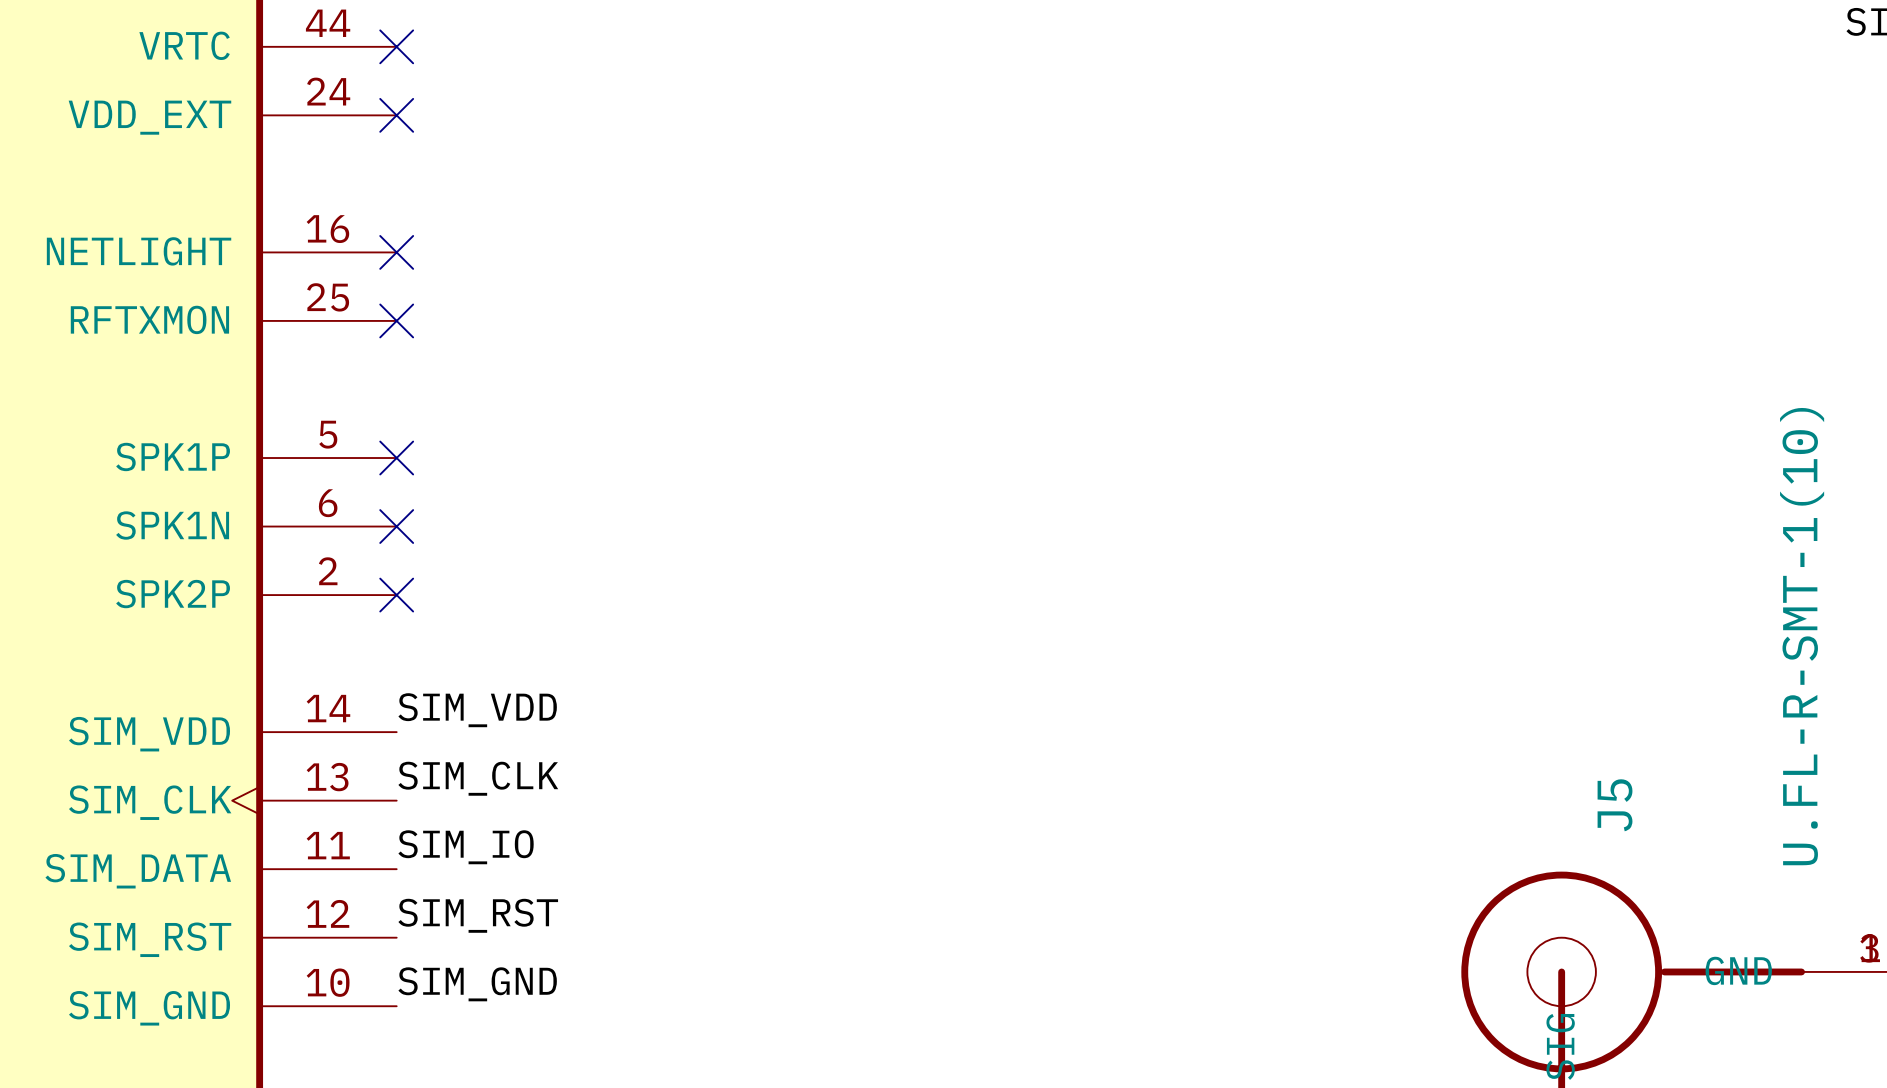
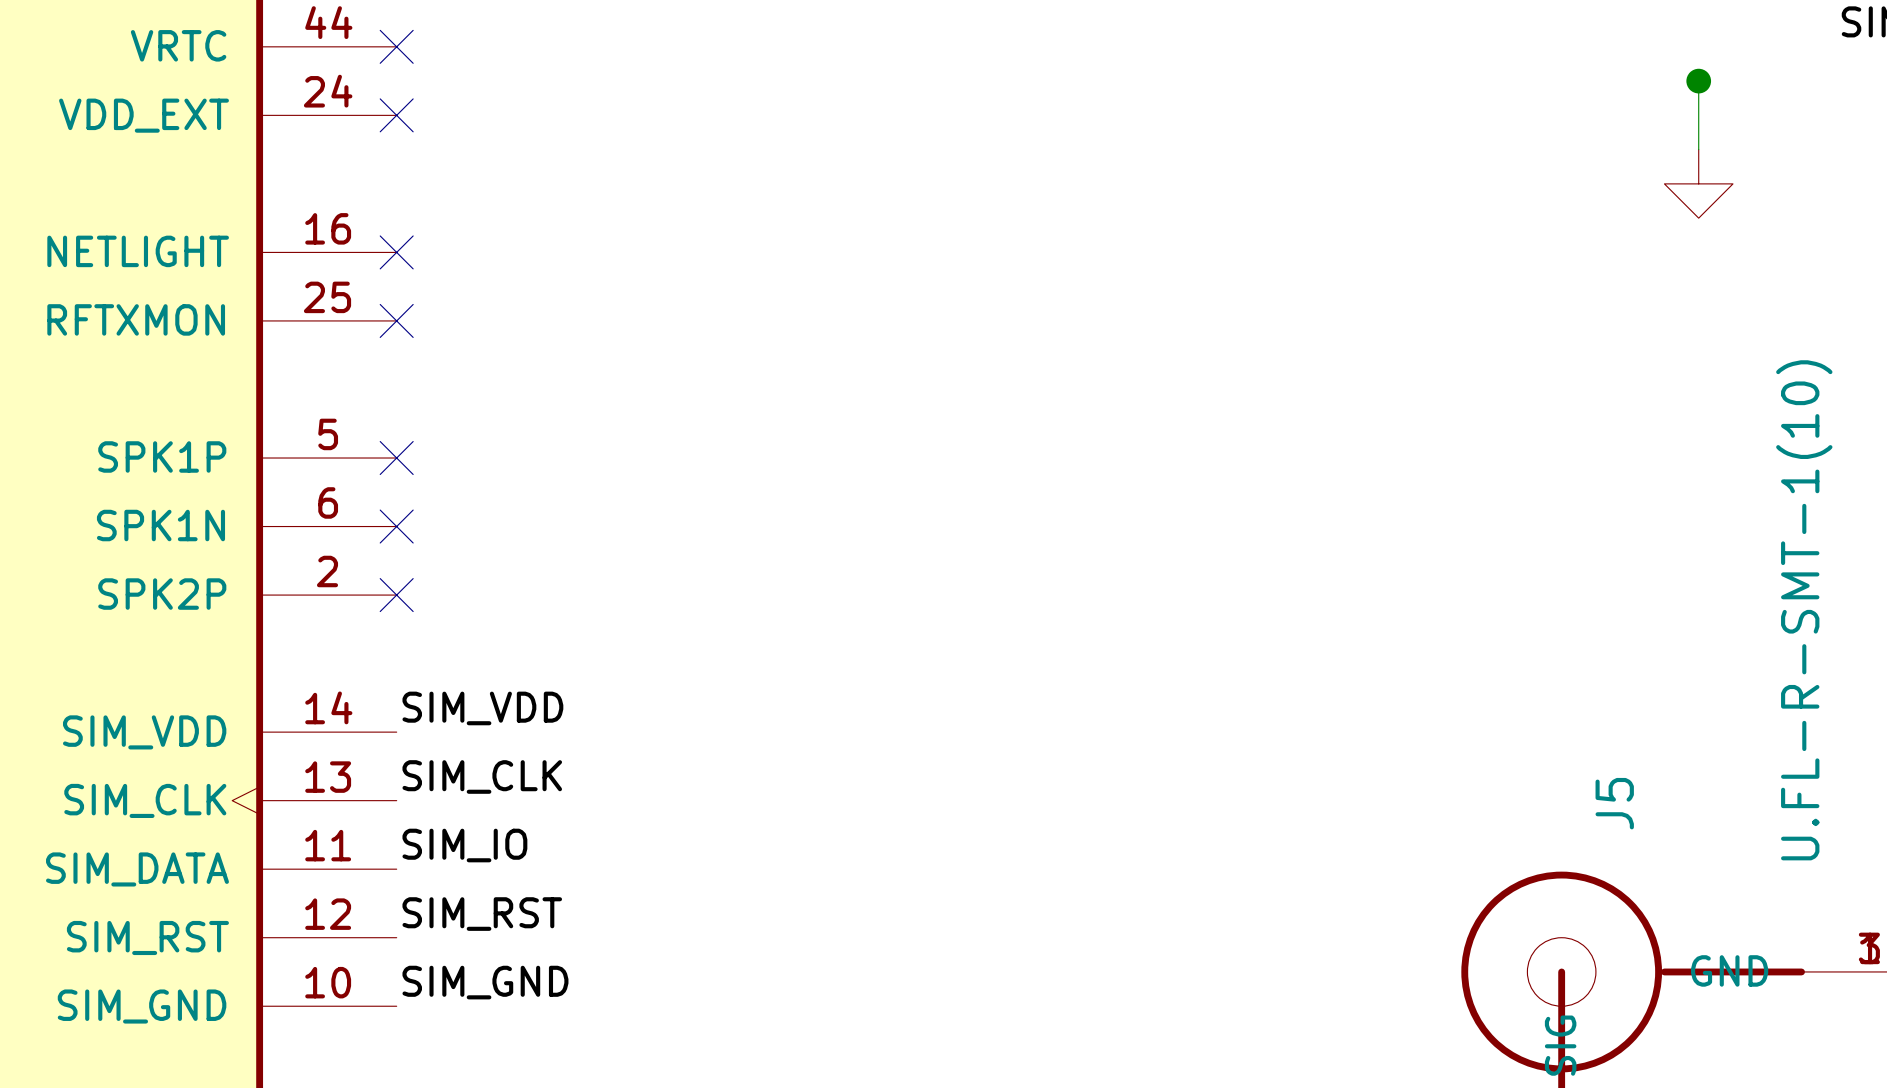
wire: none -> (1698, 81) (1698, 149)
junction: none -> (1698, 81)
power symbol: none -> (1698, 183)

